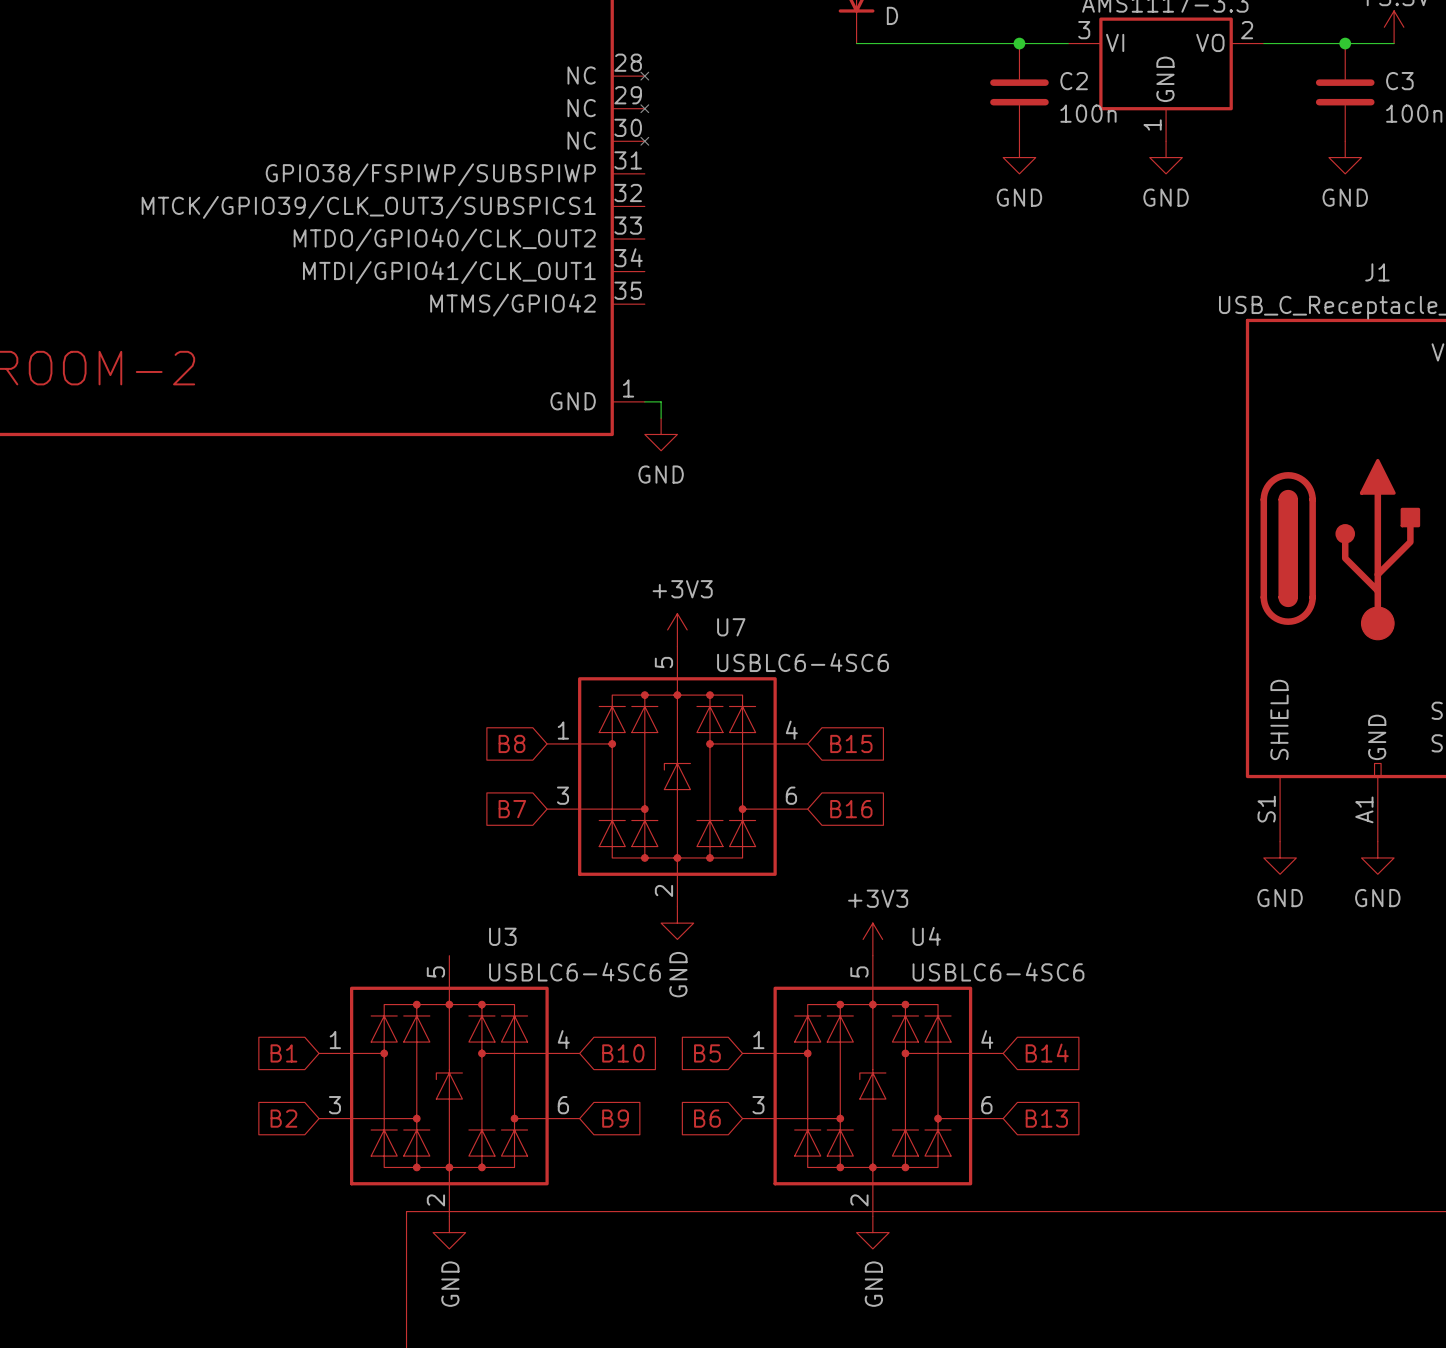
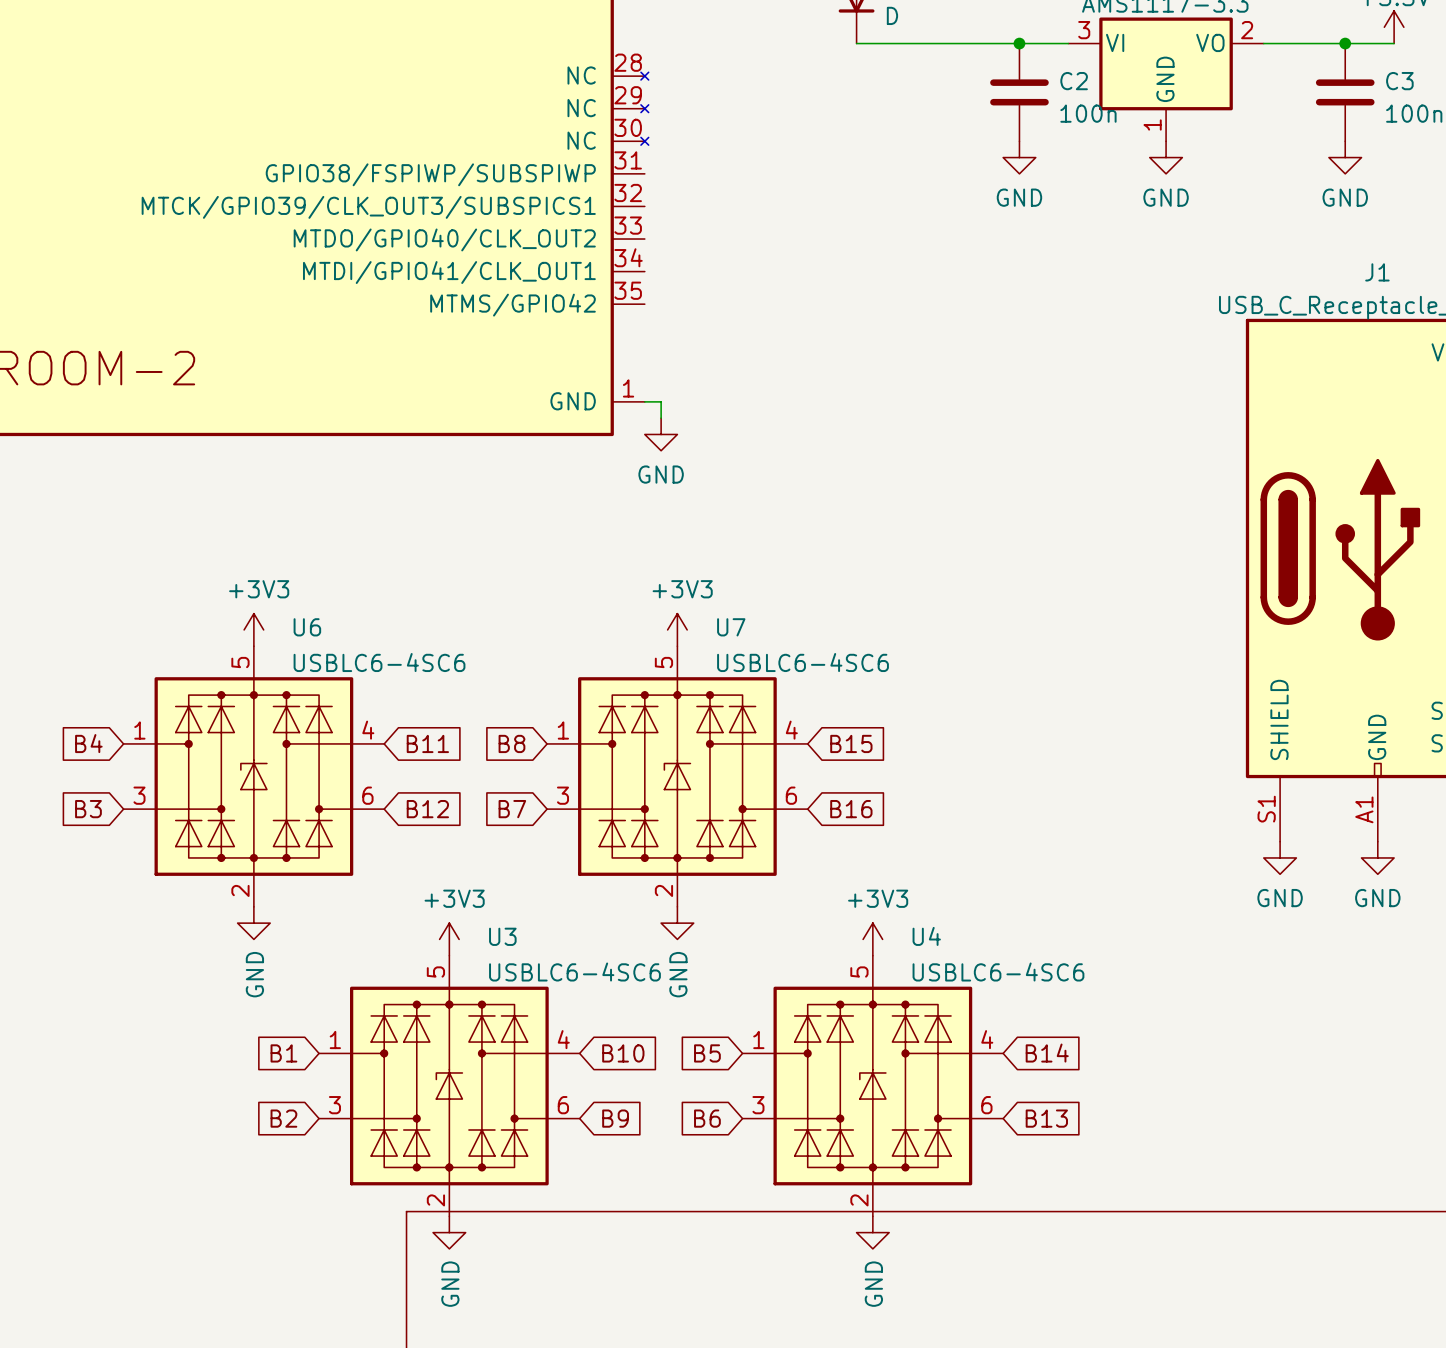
power symbol: none -> +3V3 (253, 629)
global label: none -> B4 (88, 743)
global label: none -> B11 (427, 743)
U6: none -> USBLC6-4SC6 (253, 776)
global label: none -> B3 (88, 809)
global label: none -> B12 (427, 809)
power symbol: none -> GND (253, 923)
power symbol: none -> +3V3 (449, 939)

